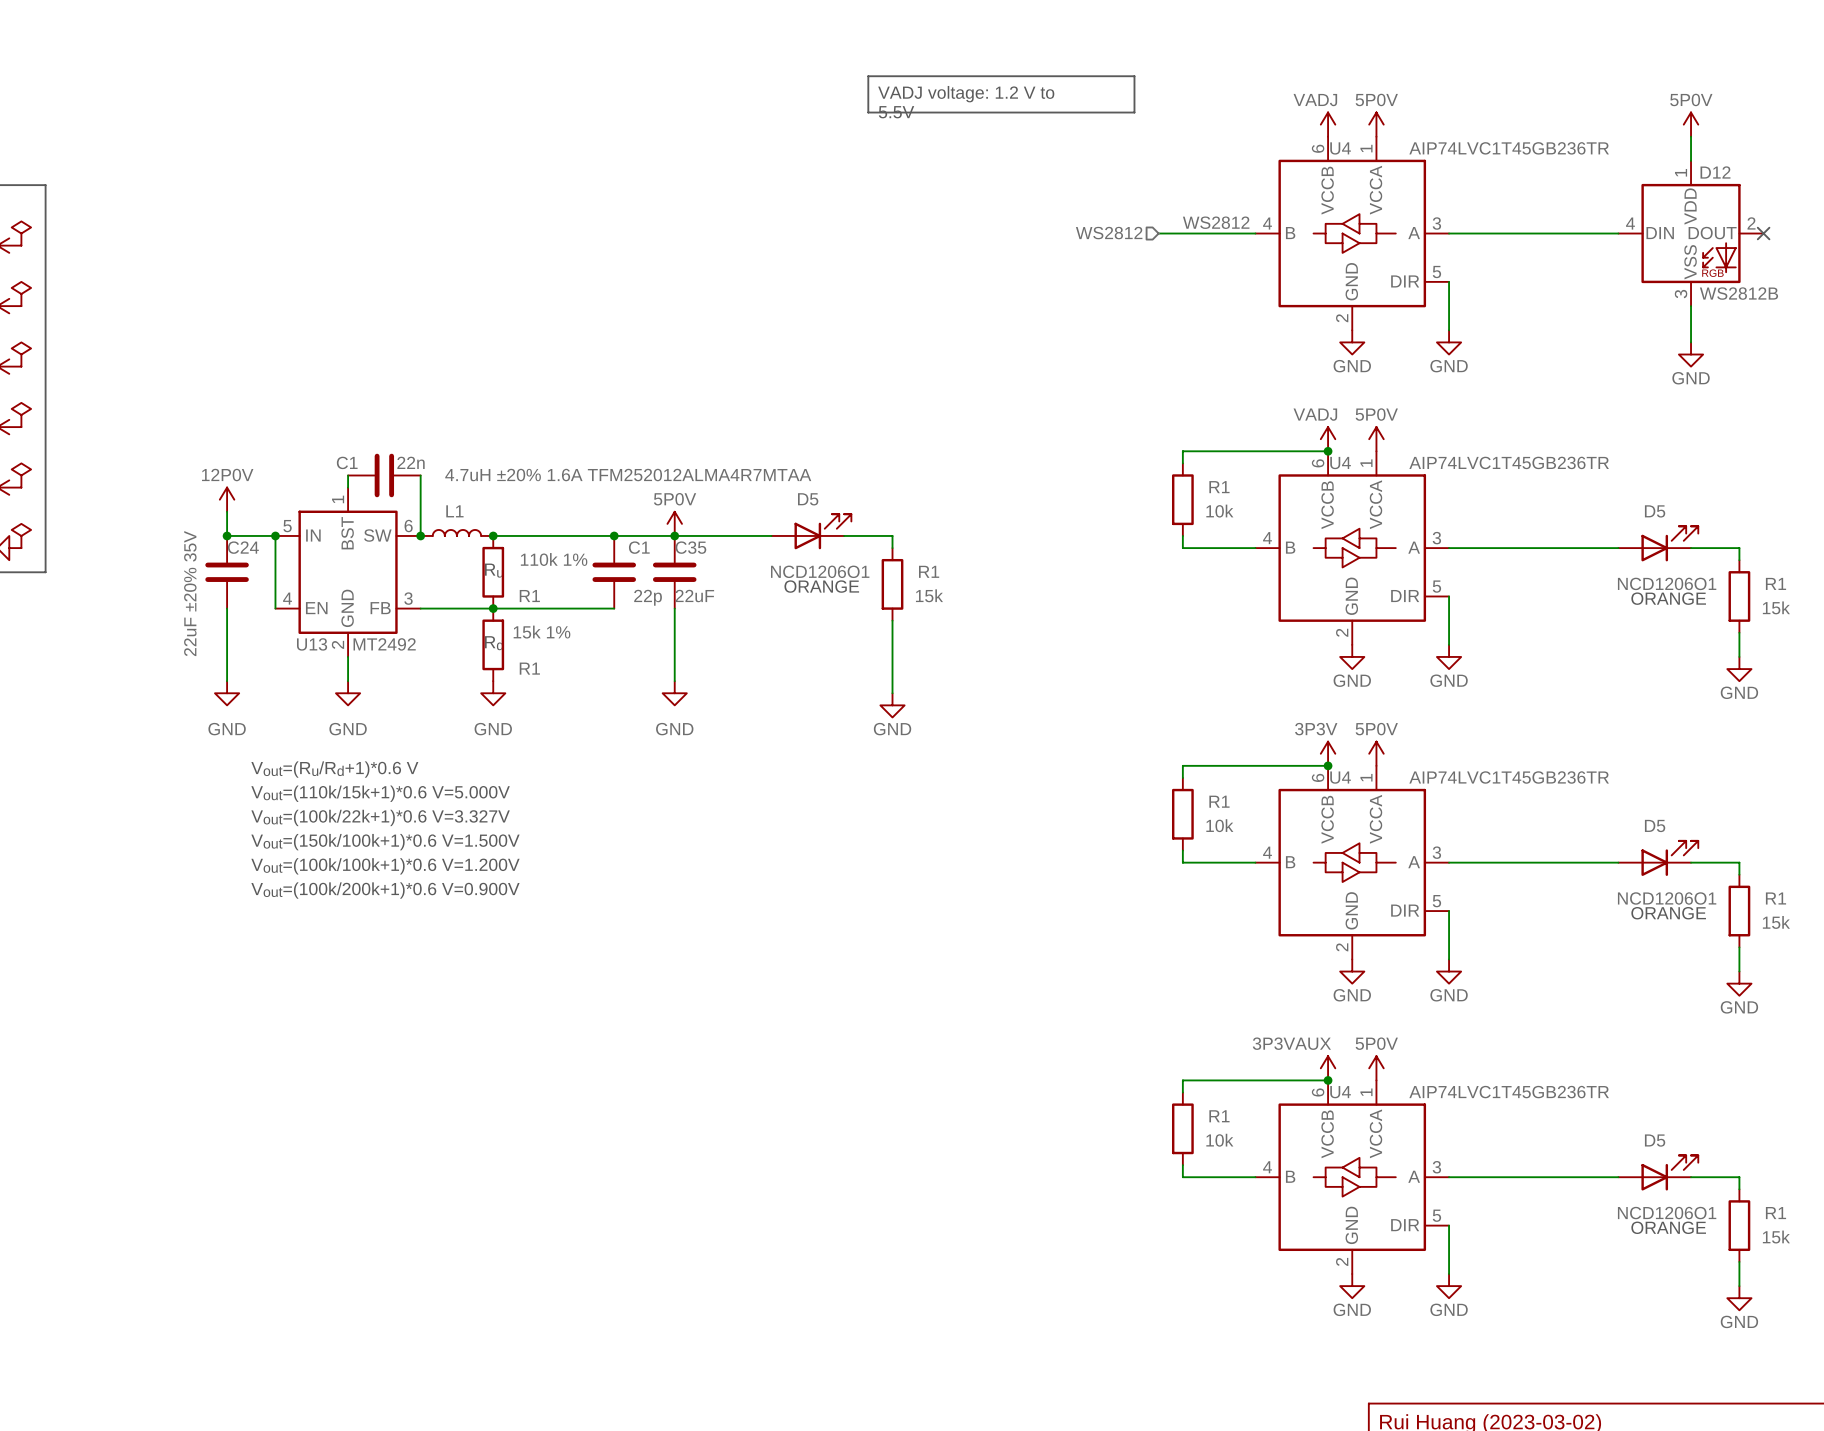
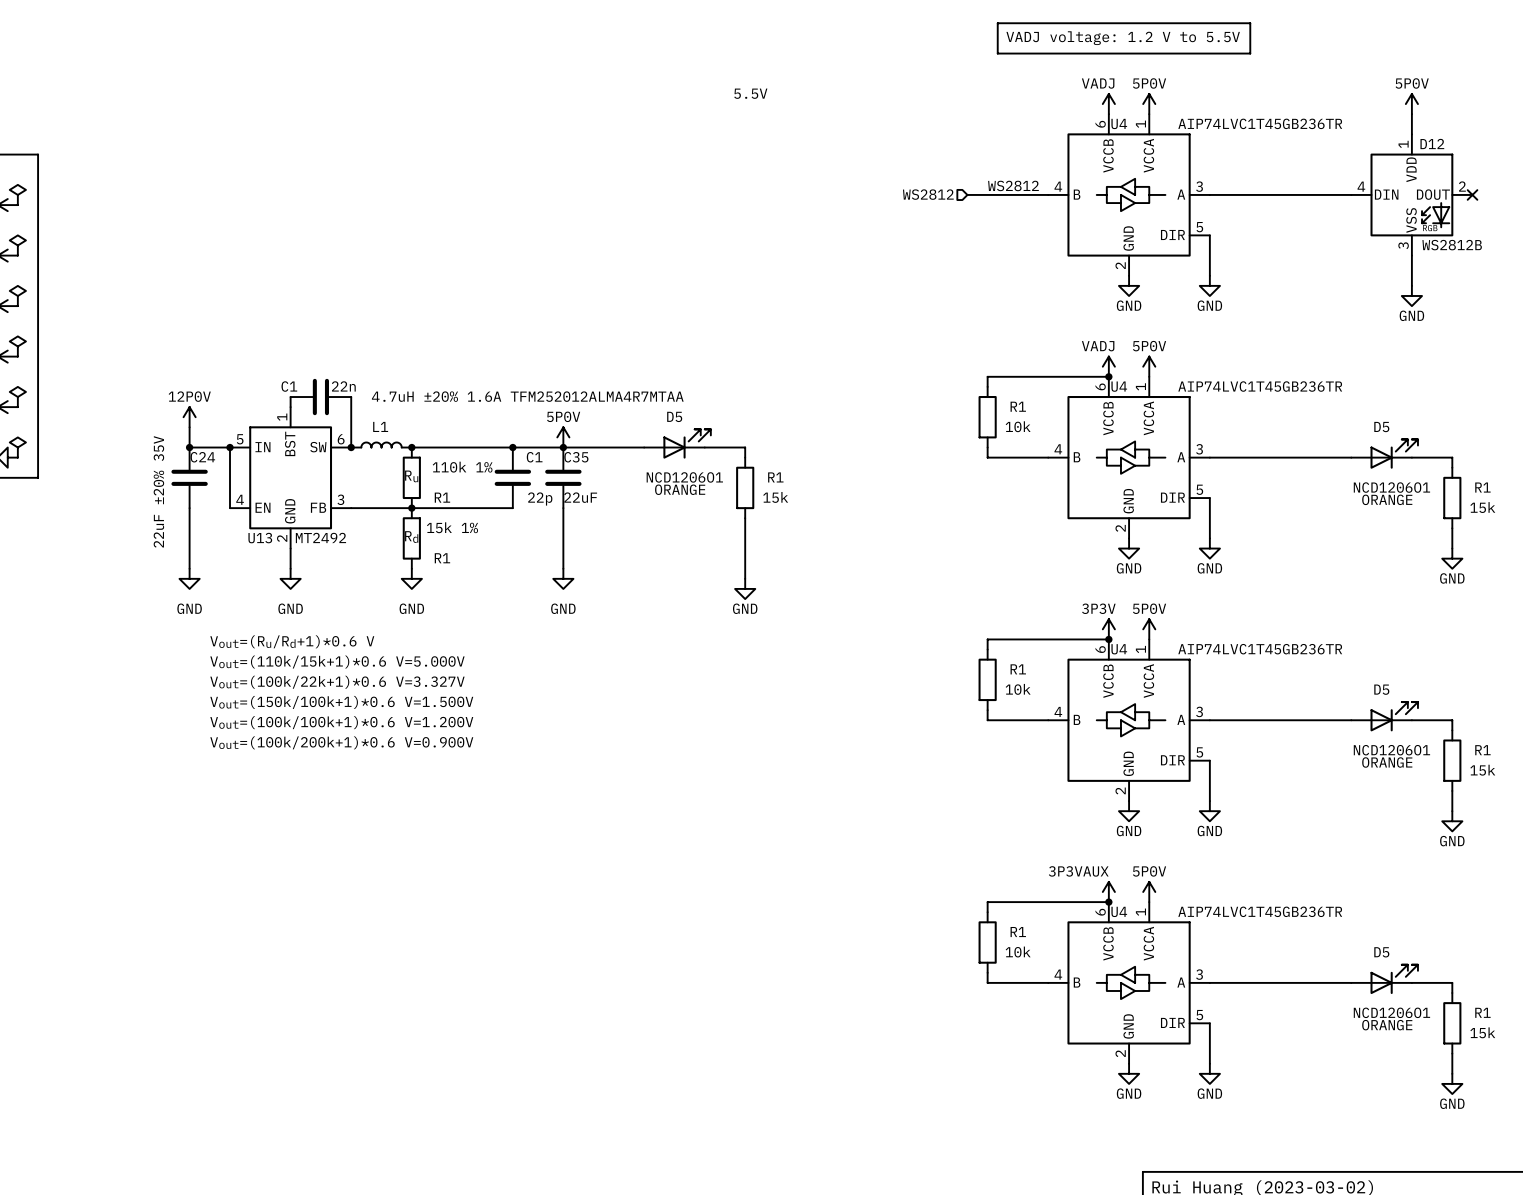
line: none -> (997, 23) (1250, 23) (1250, 53) (997, 53) (997, 23)
text: none -> VADJ voltage: 1.2 V to 5.5V (1123, 38)
line: (868, 76) (1134, 76) (1134, 112) (868, 112) (868, 76) -> none
text: VADJ voltage: 1.2 V to (966, 94) -> none

